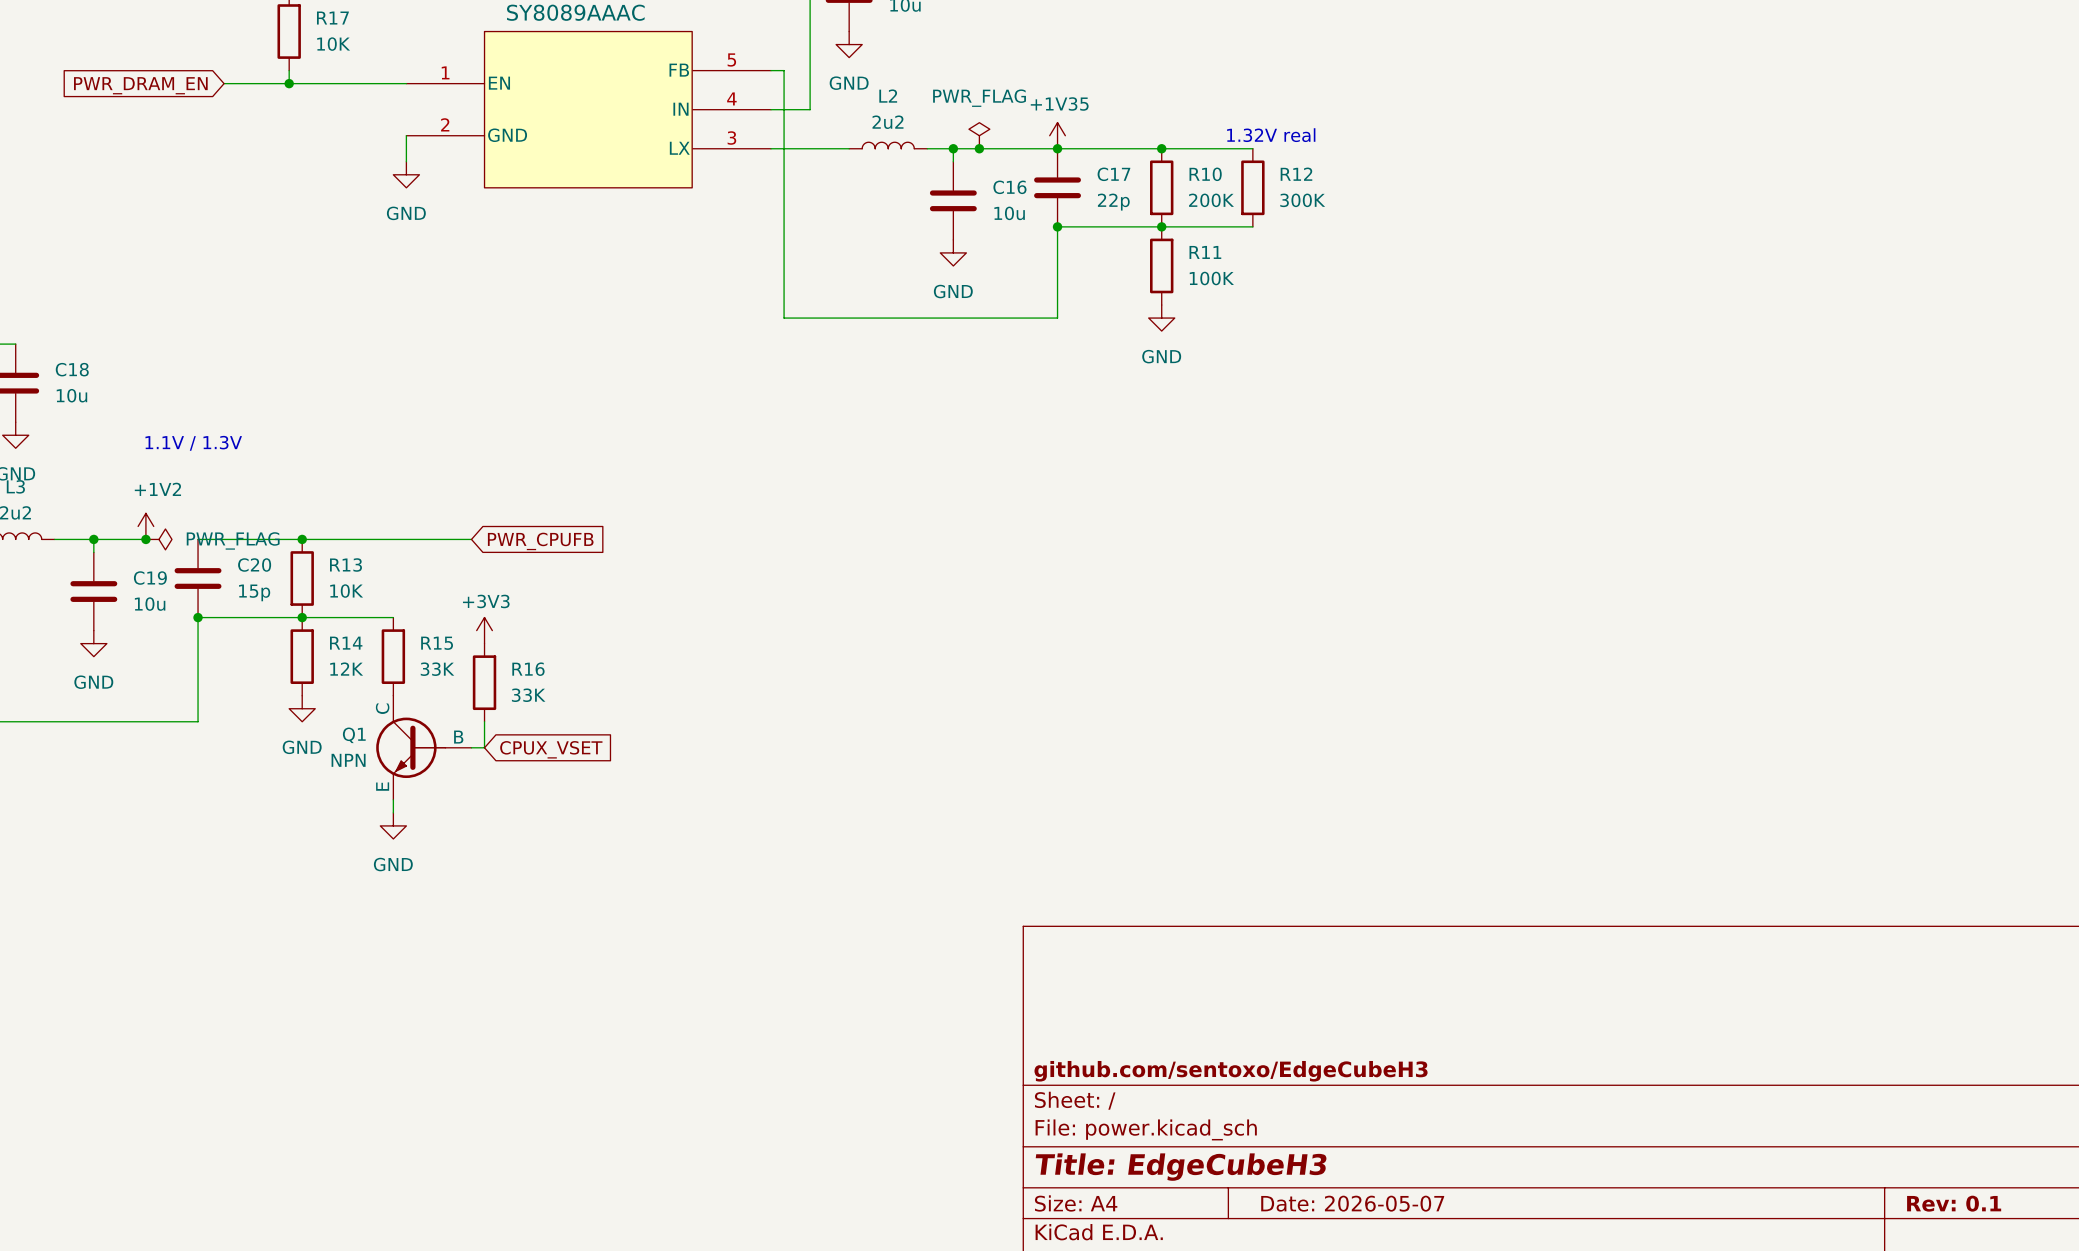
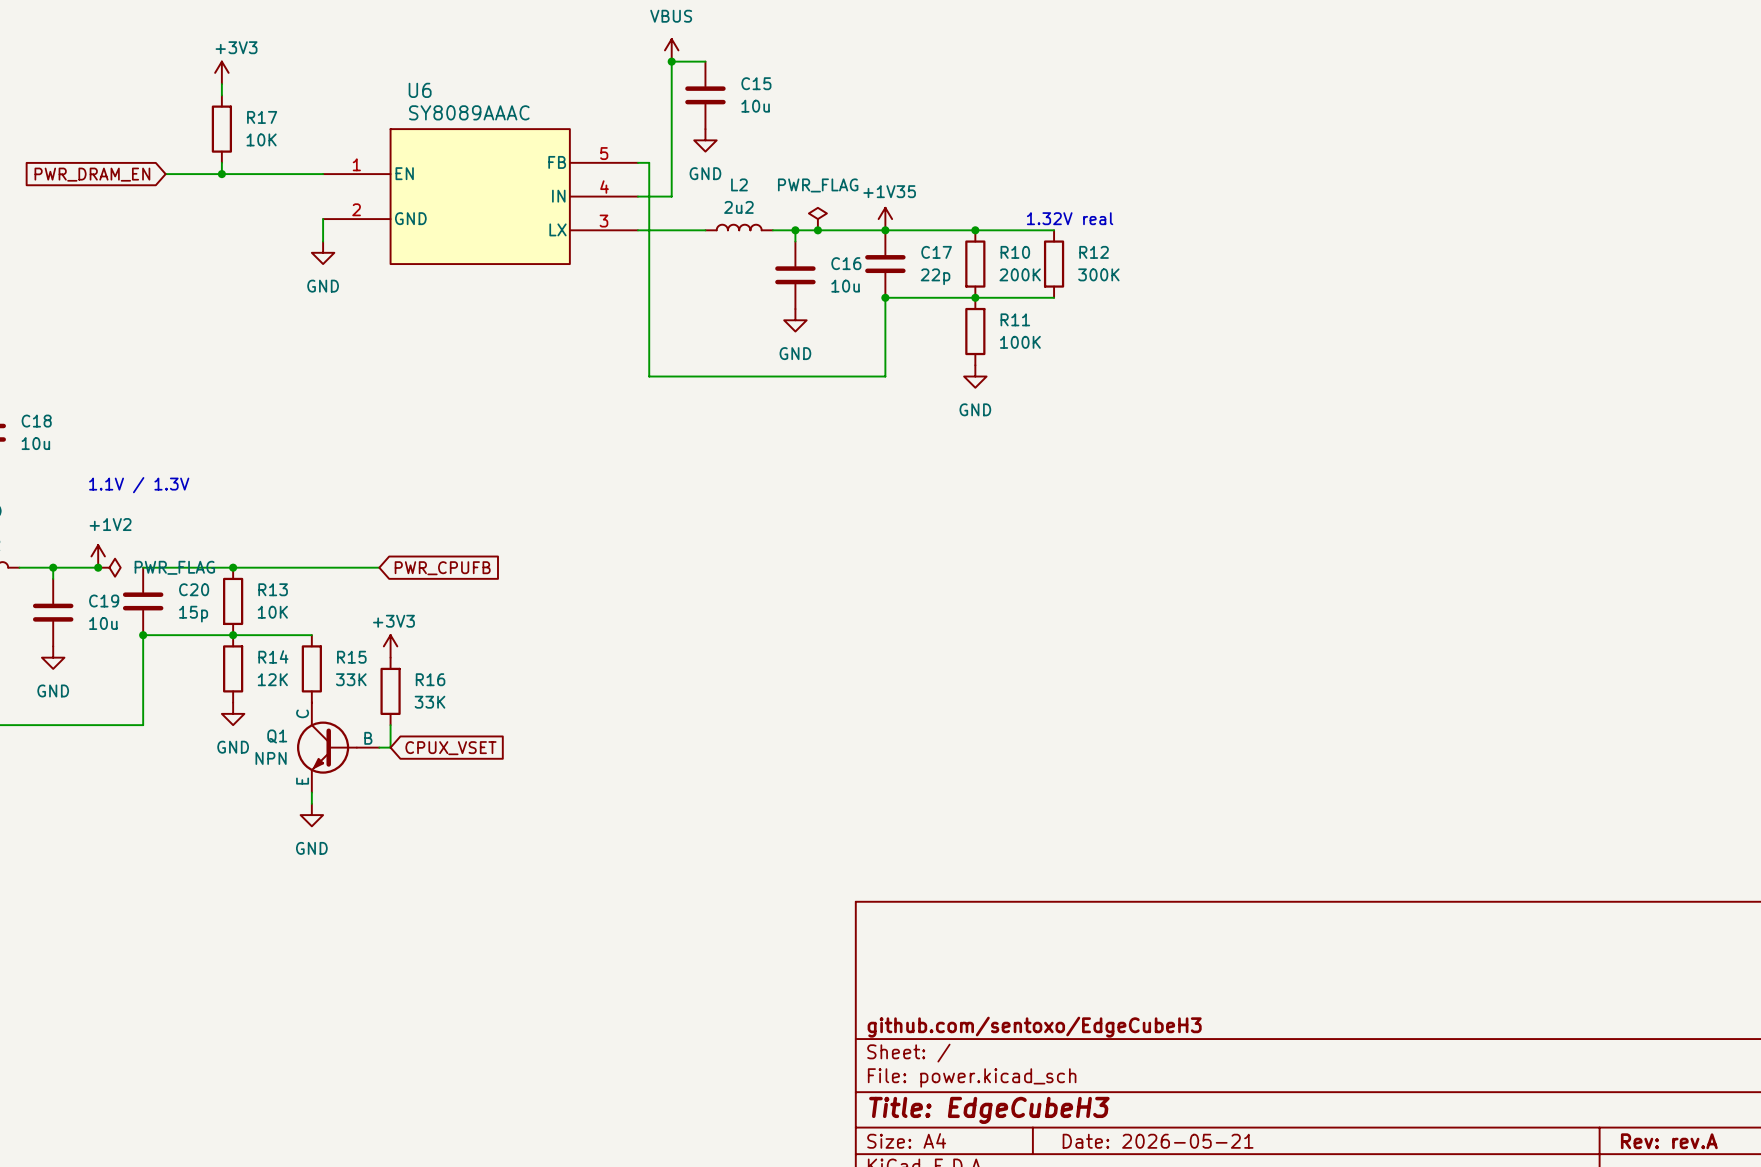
title block: Date: 2026-05-07 (1352, 1203) -> Date: 2026-05-21 (1158, 1141)
title block: Rev: 0.1 (1954, 1203) -> Rev: rev.A (1669, 1141)

